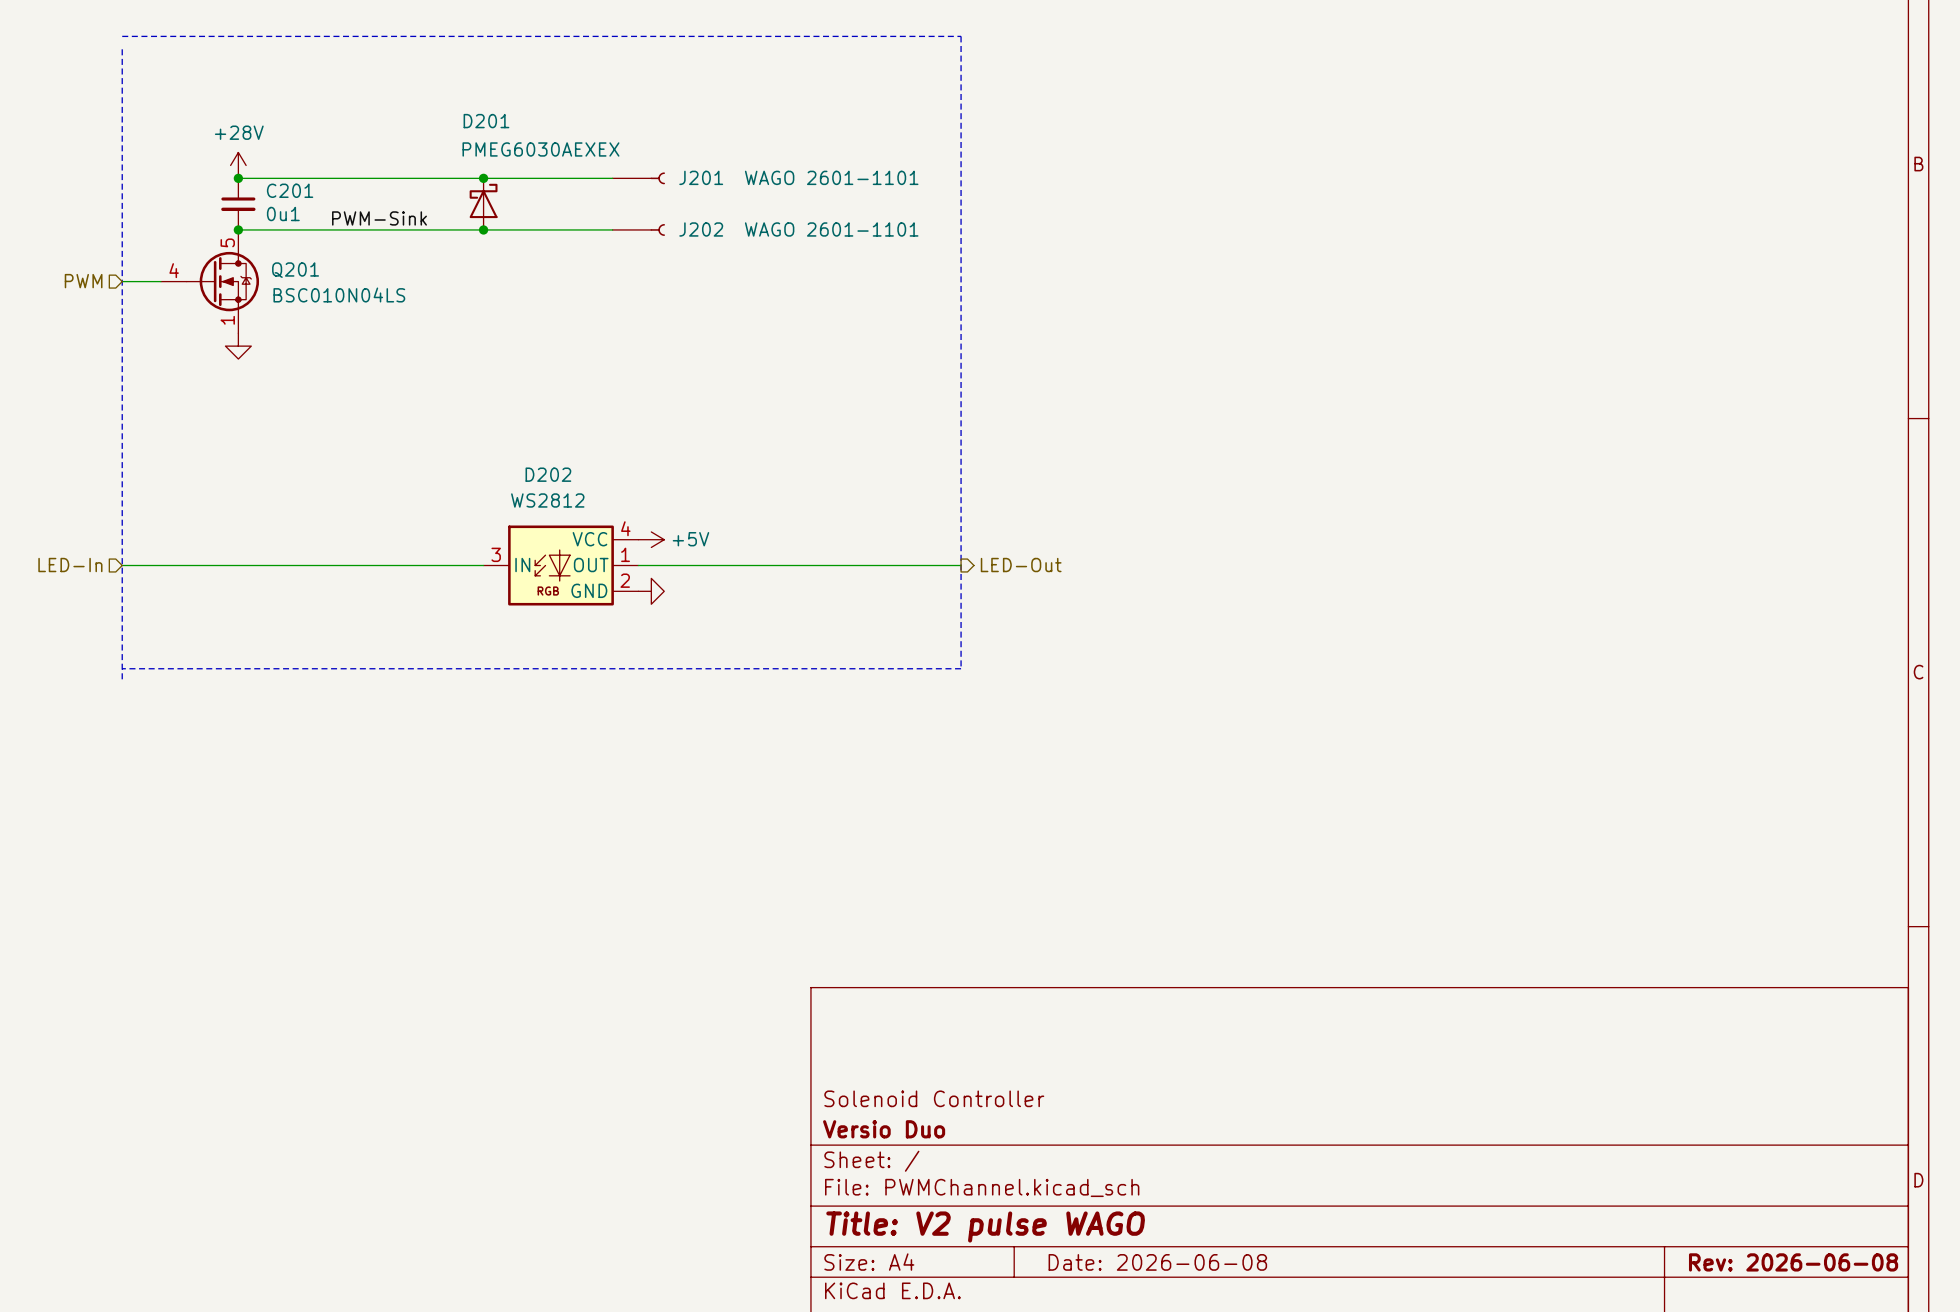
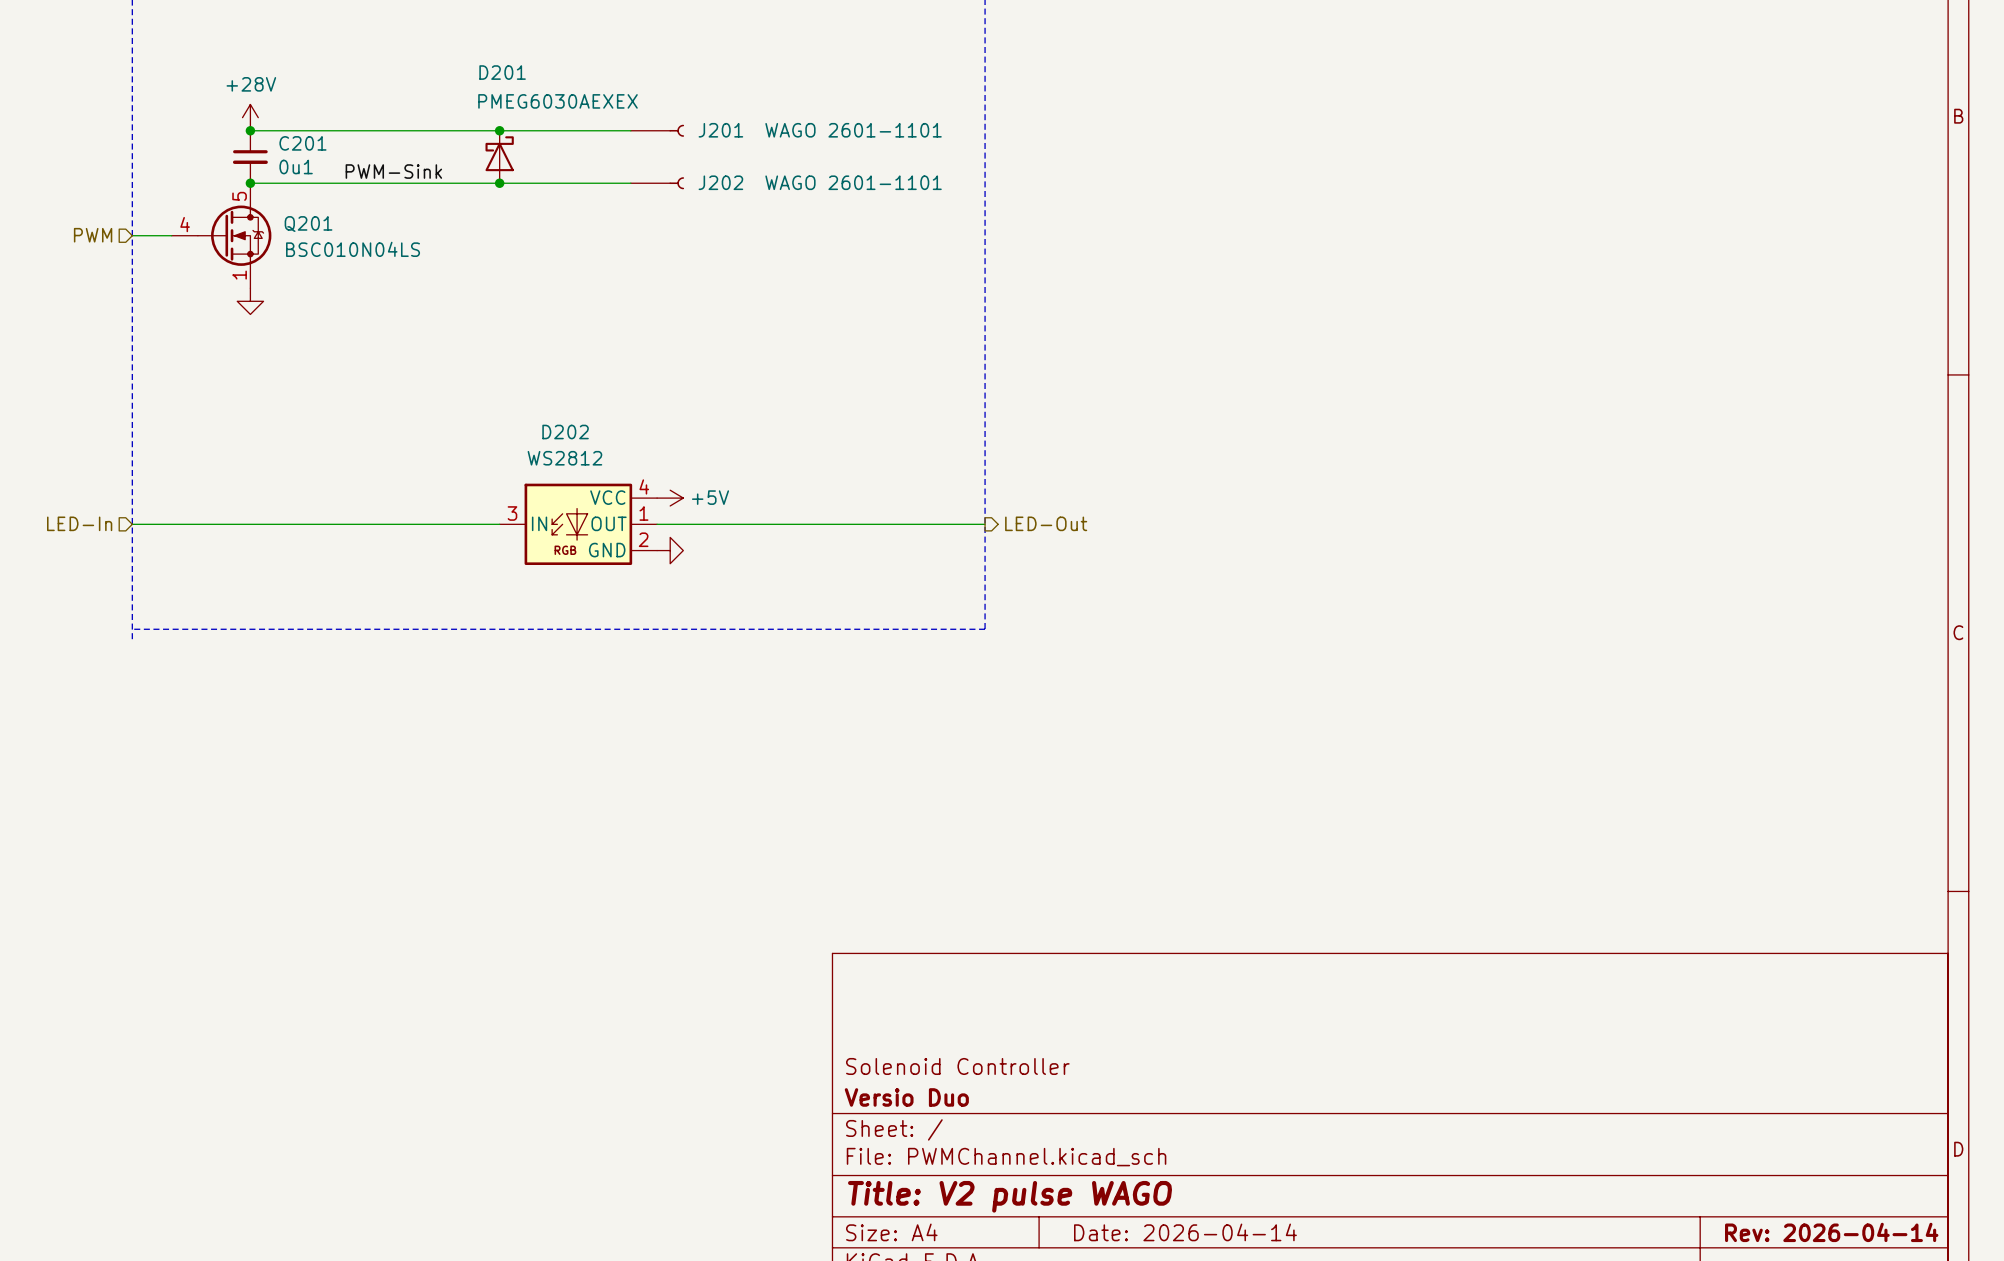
title block: Date: 2026-06-08 (1157, 1262) -> Date: 2026-04-14 (1185, 1232)
title block: Rev: 2026-06-08 (1793, 1262) -> Rev: 2026-04-14 (1831, 1232)

